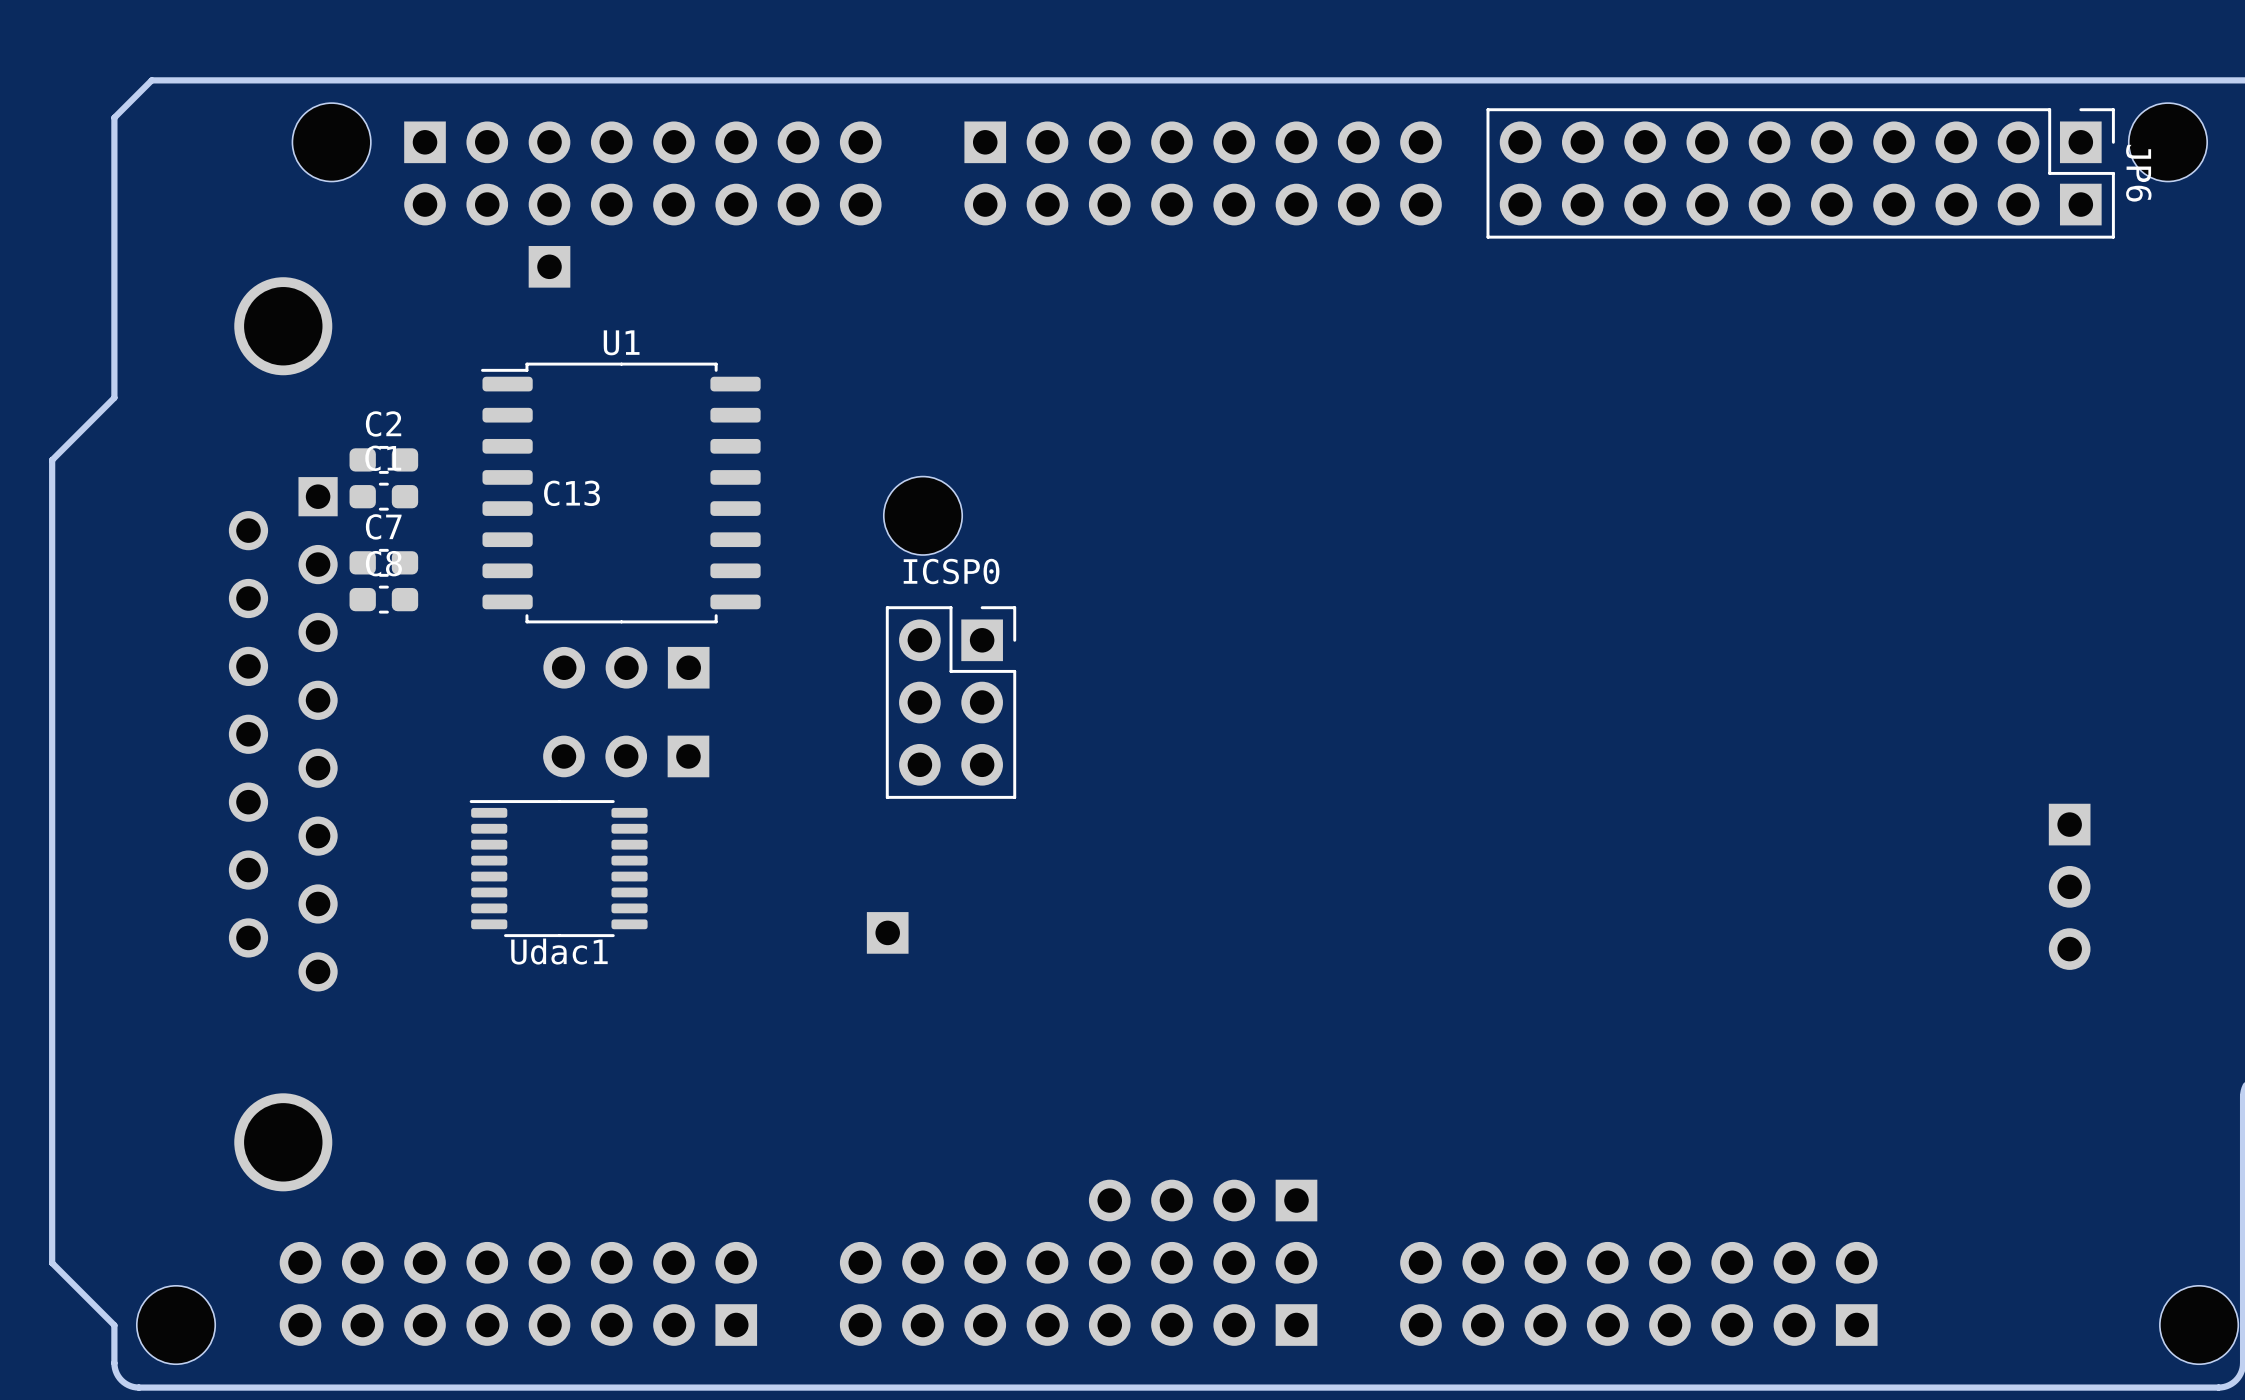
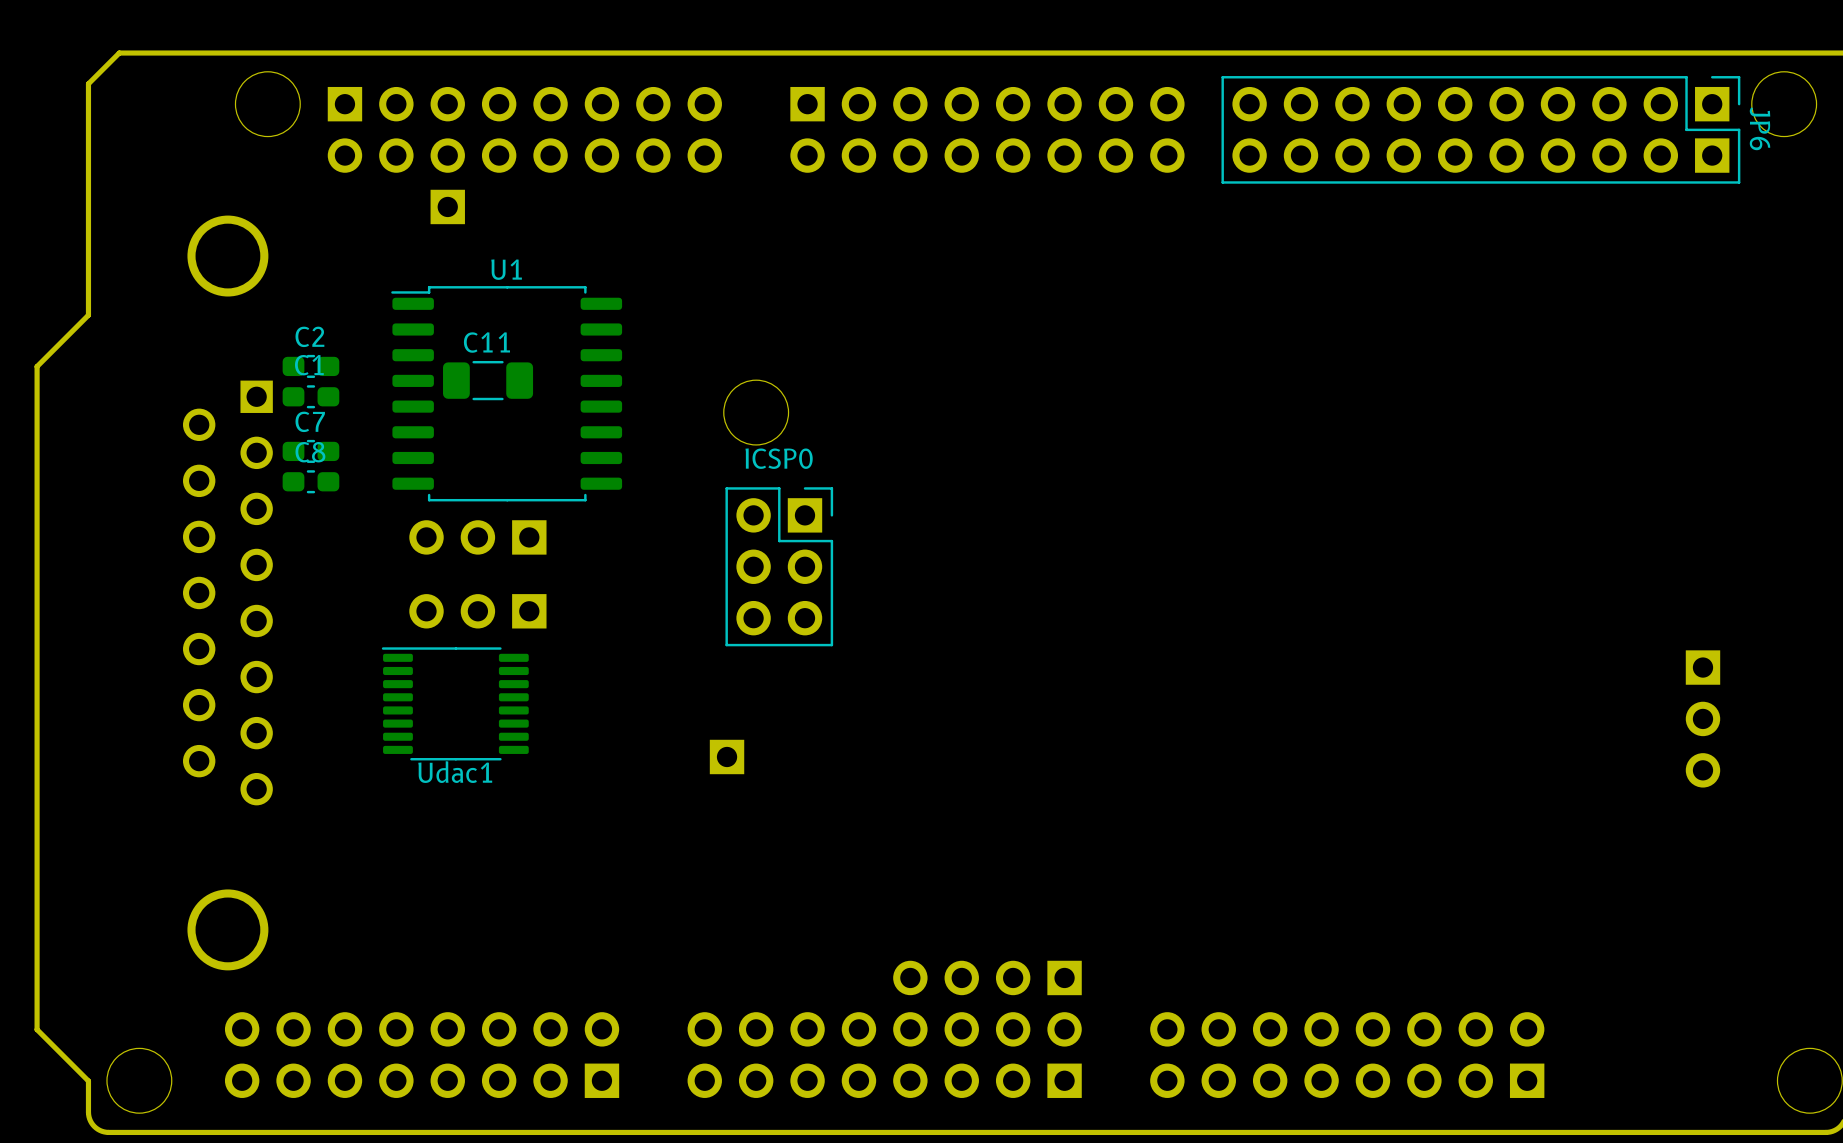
C11: none -> (488, 380)
C13: (571, 493) -> none
part position: (626, 667) -> (477, 537)
part position: (626, 756) -> (477, 611)

